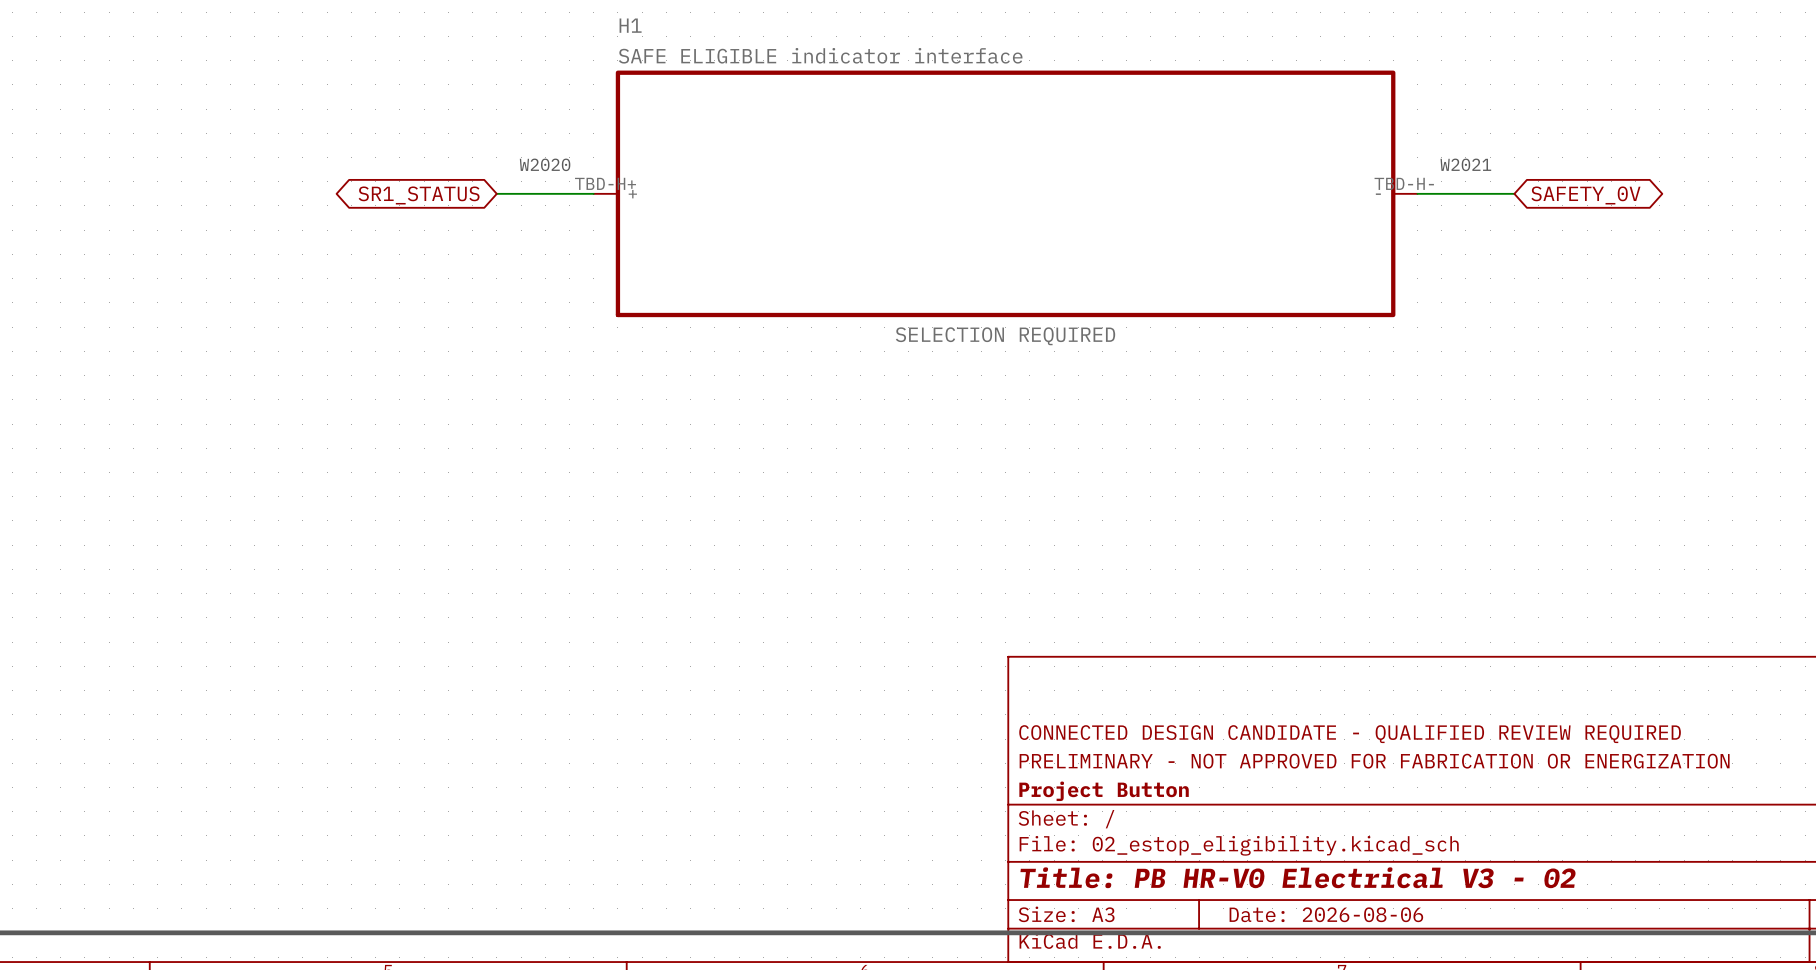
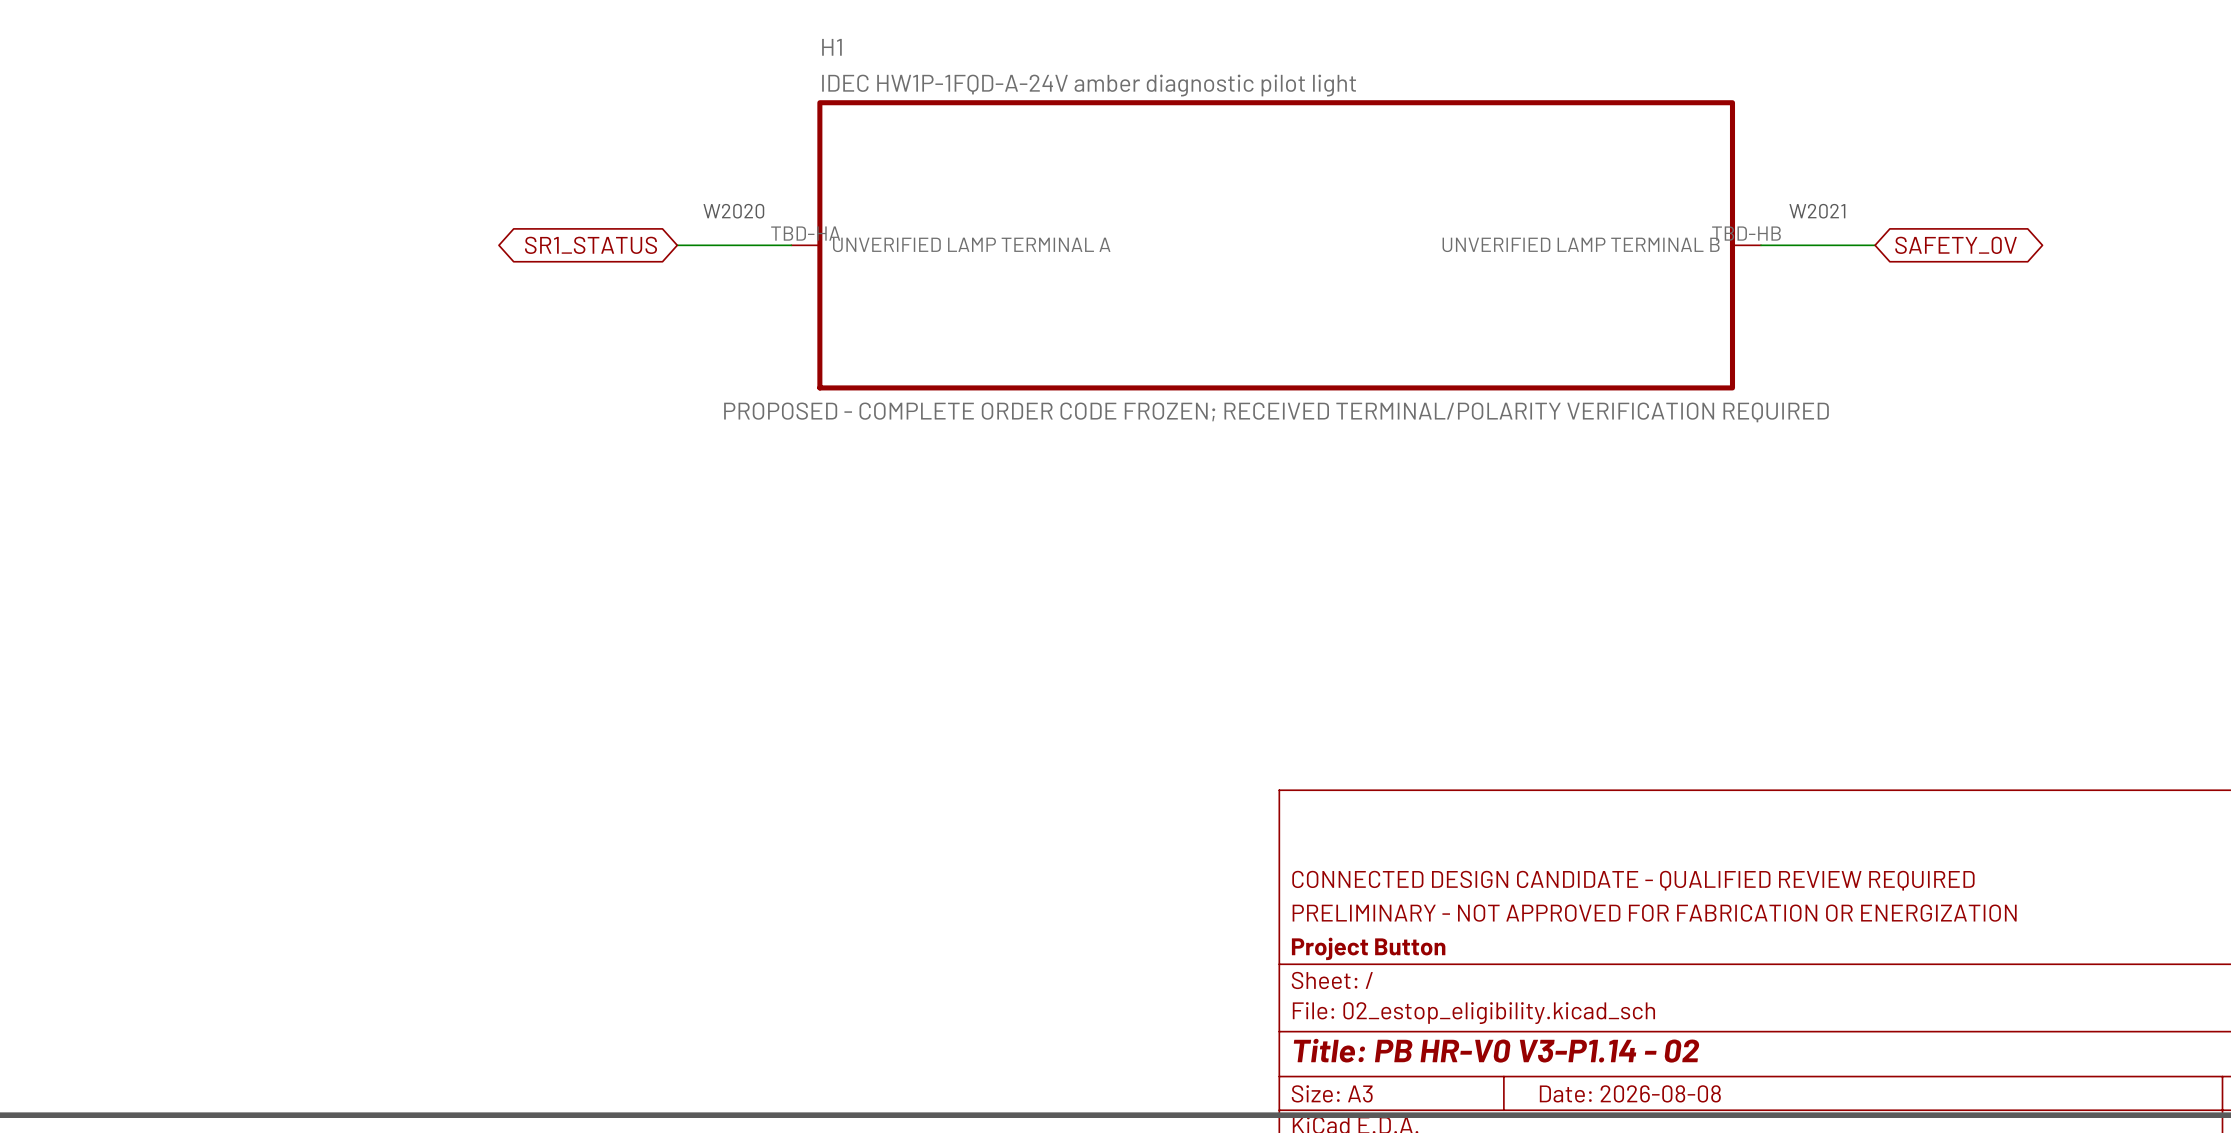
H1 text: SAFE ELIGIBLE indicator interface (820, 55) -> IDEC HW1P-1FQD-A-24V amber diagnostic pilot light (1089, 85)
H1 pin number: TBD-H+ (605, 183) -> TBD-HA (805, 233)
H1 pin number: TBD-H- (1404, 183) -> TBD-HB (1746, 233)
H1 pin name: + (632, 194) -> UNVERIFIED LAMP TERMINAL A (971, 244)
H1 pin name: - (1378, 194) -> UNVERIFIED LAMP TERMINAL B (1581, 244)
H1 text: SELECTION REQUIRED (1005, 336) -> PROPOSED - COMPLETE ORDER CODE FROZEN; RECEIVED TERMINAL/POLARITY VERIFICATION REQUIRED (1276, 412)
title block: Title: PB HR-V0 Electrical V3 - 02 (1298, 877) -> Title: PB HR-V0 V3-P1.14 - 02 (1496, 1050)
title block: Date: 2026-08-06 (1326, 914) -> Date: 2026-08-08 (1630, 1093)

